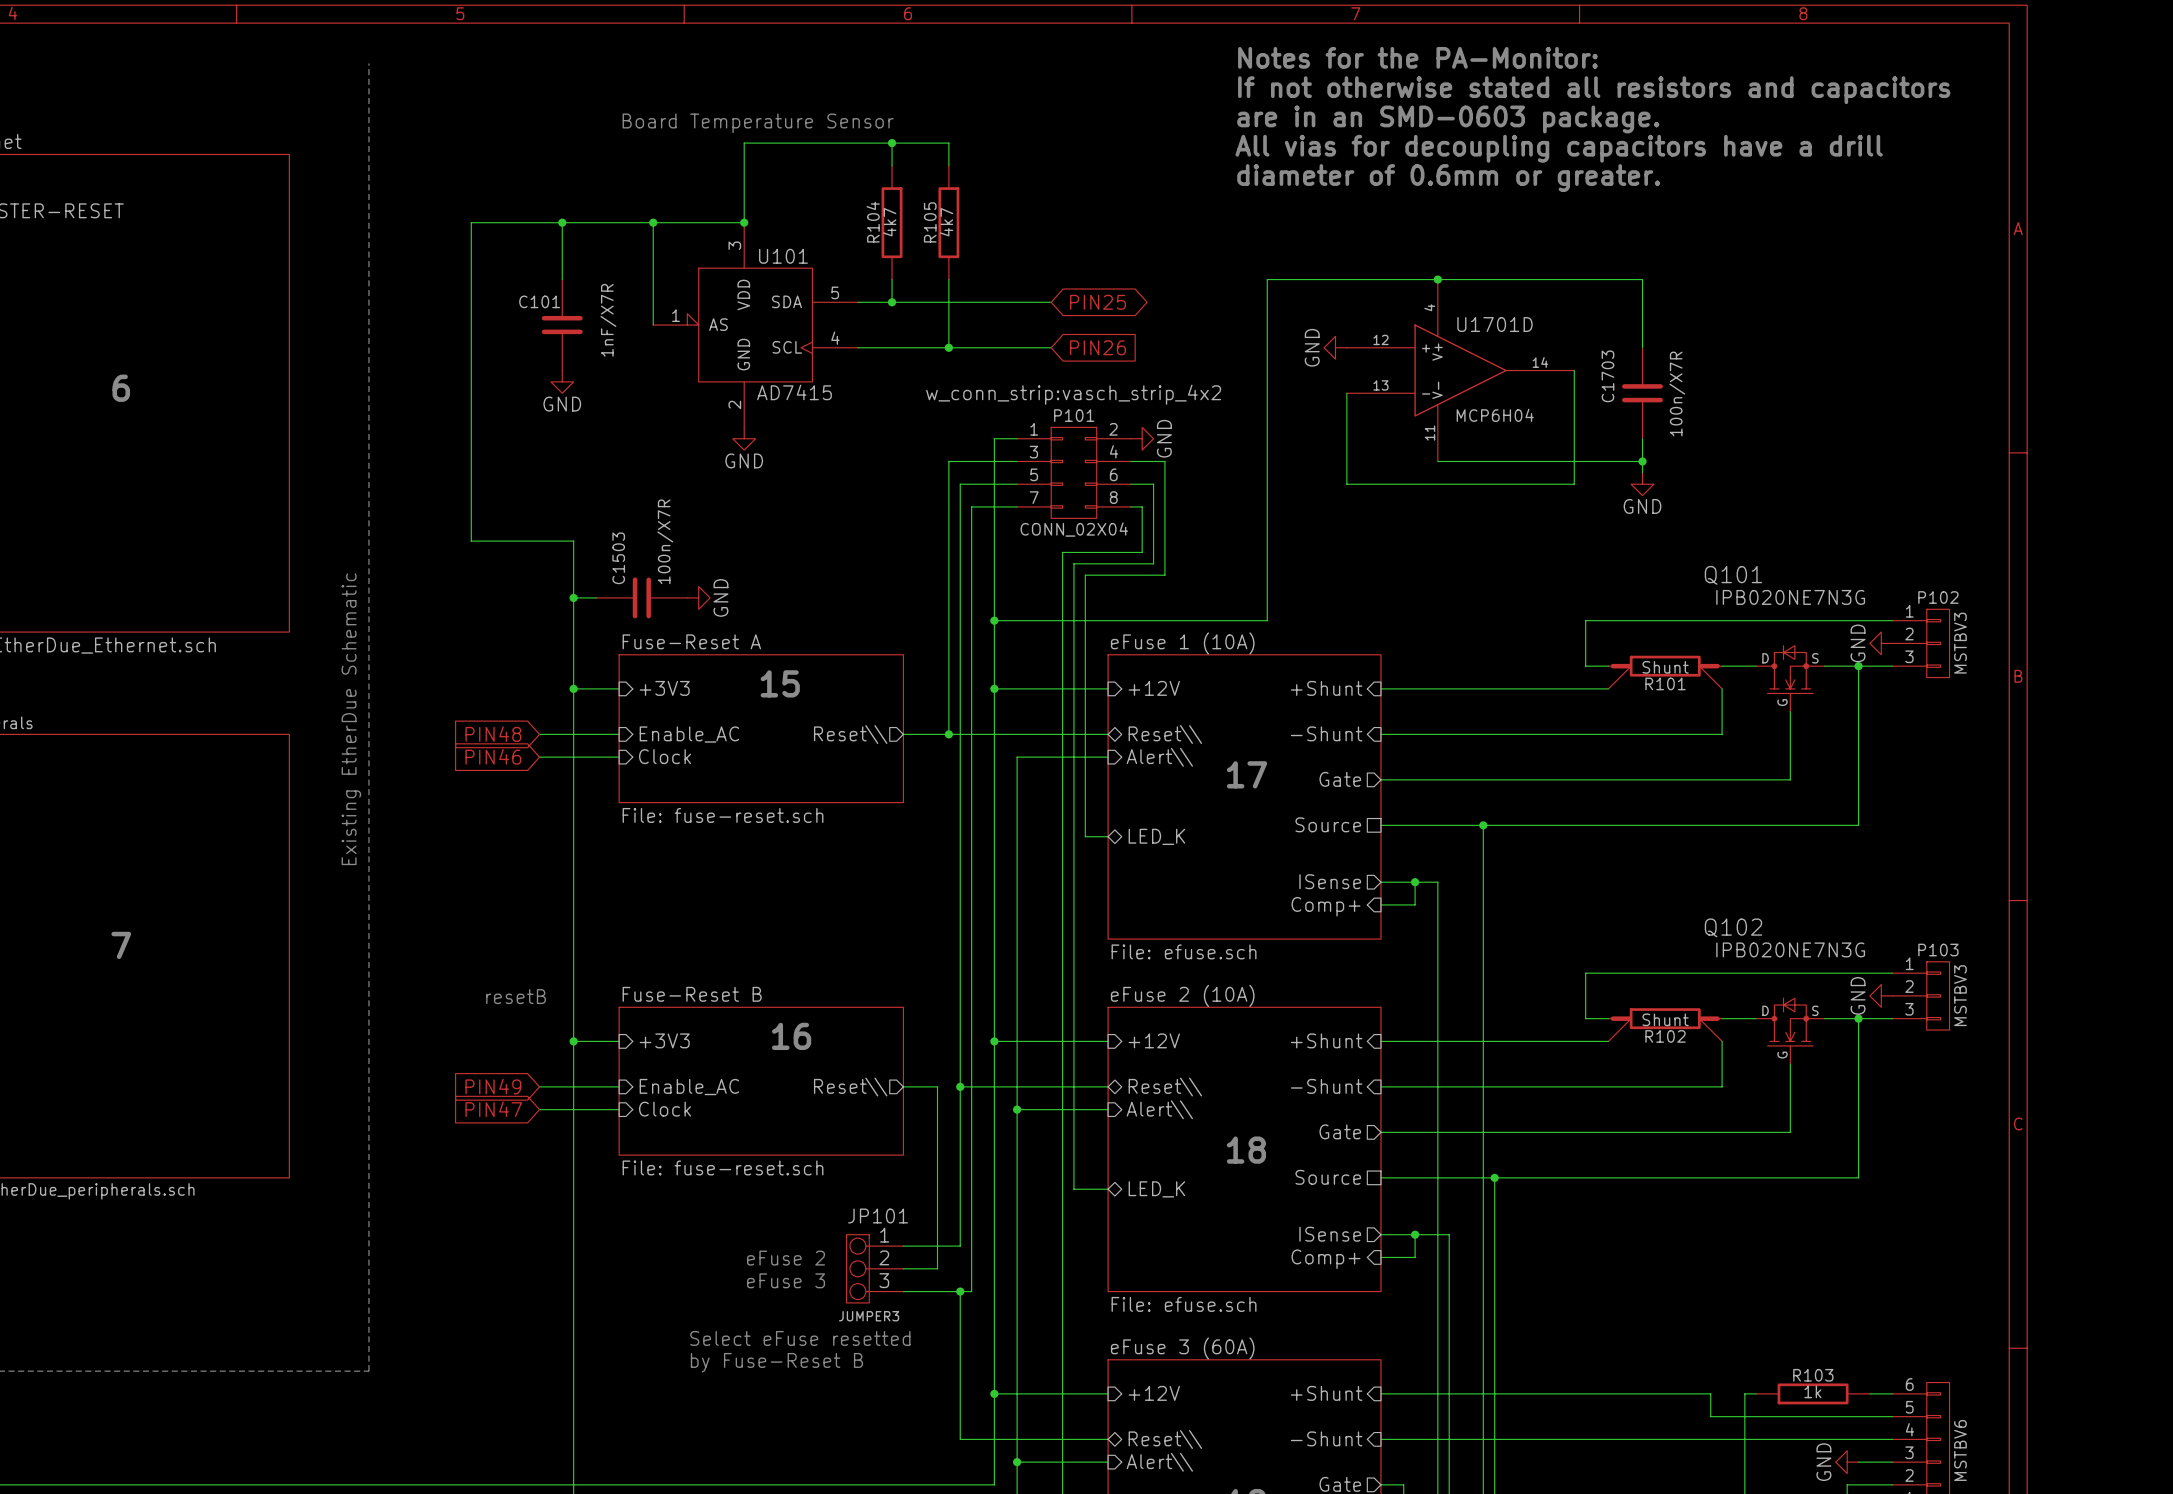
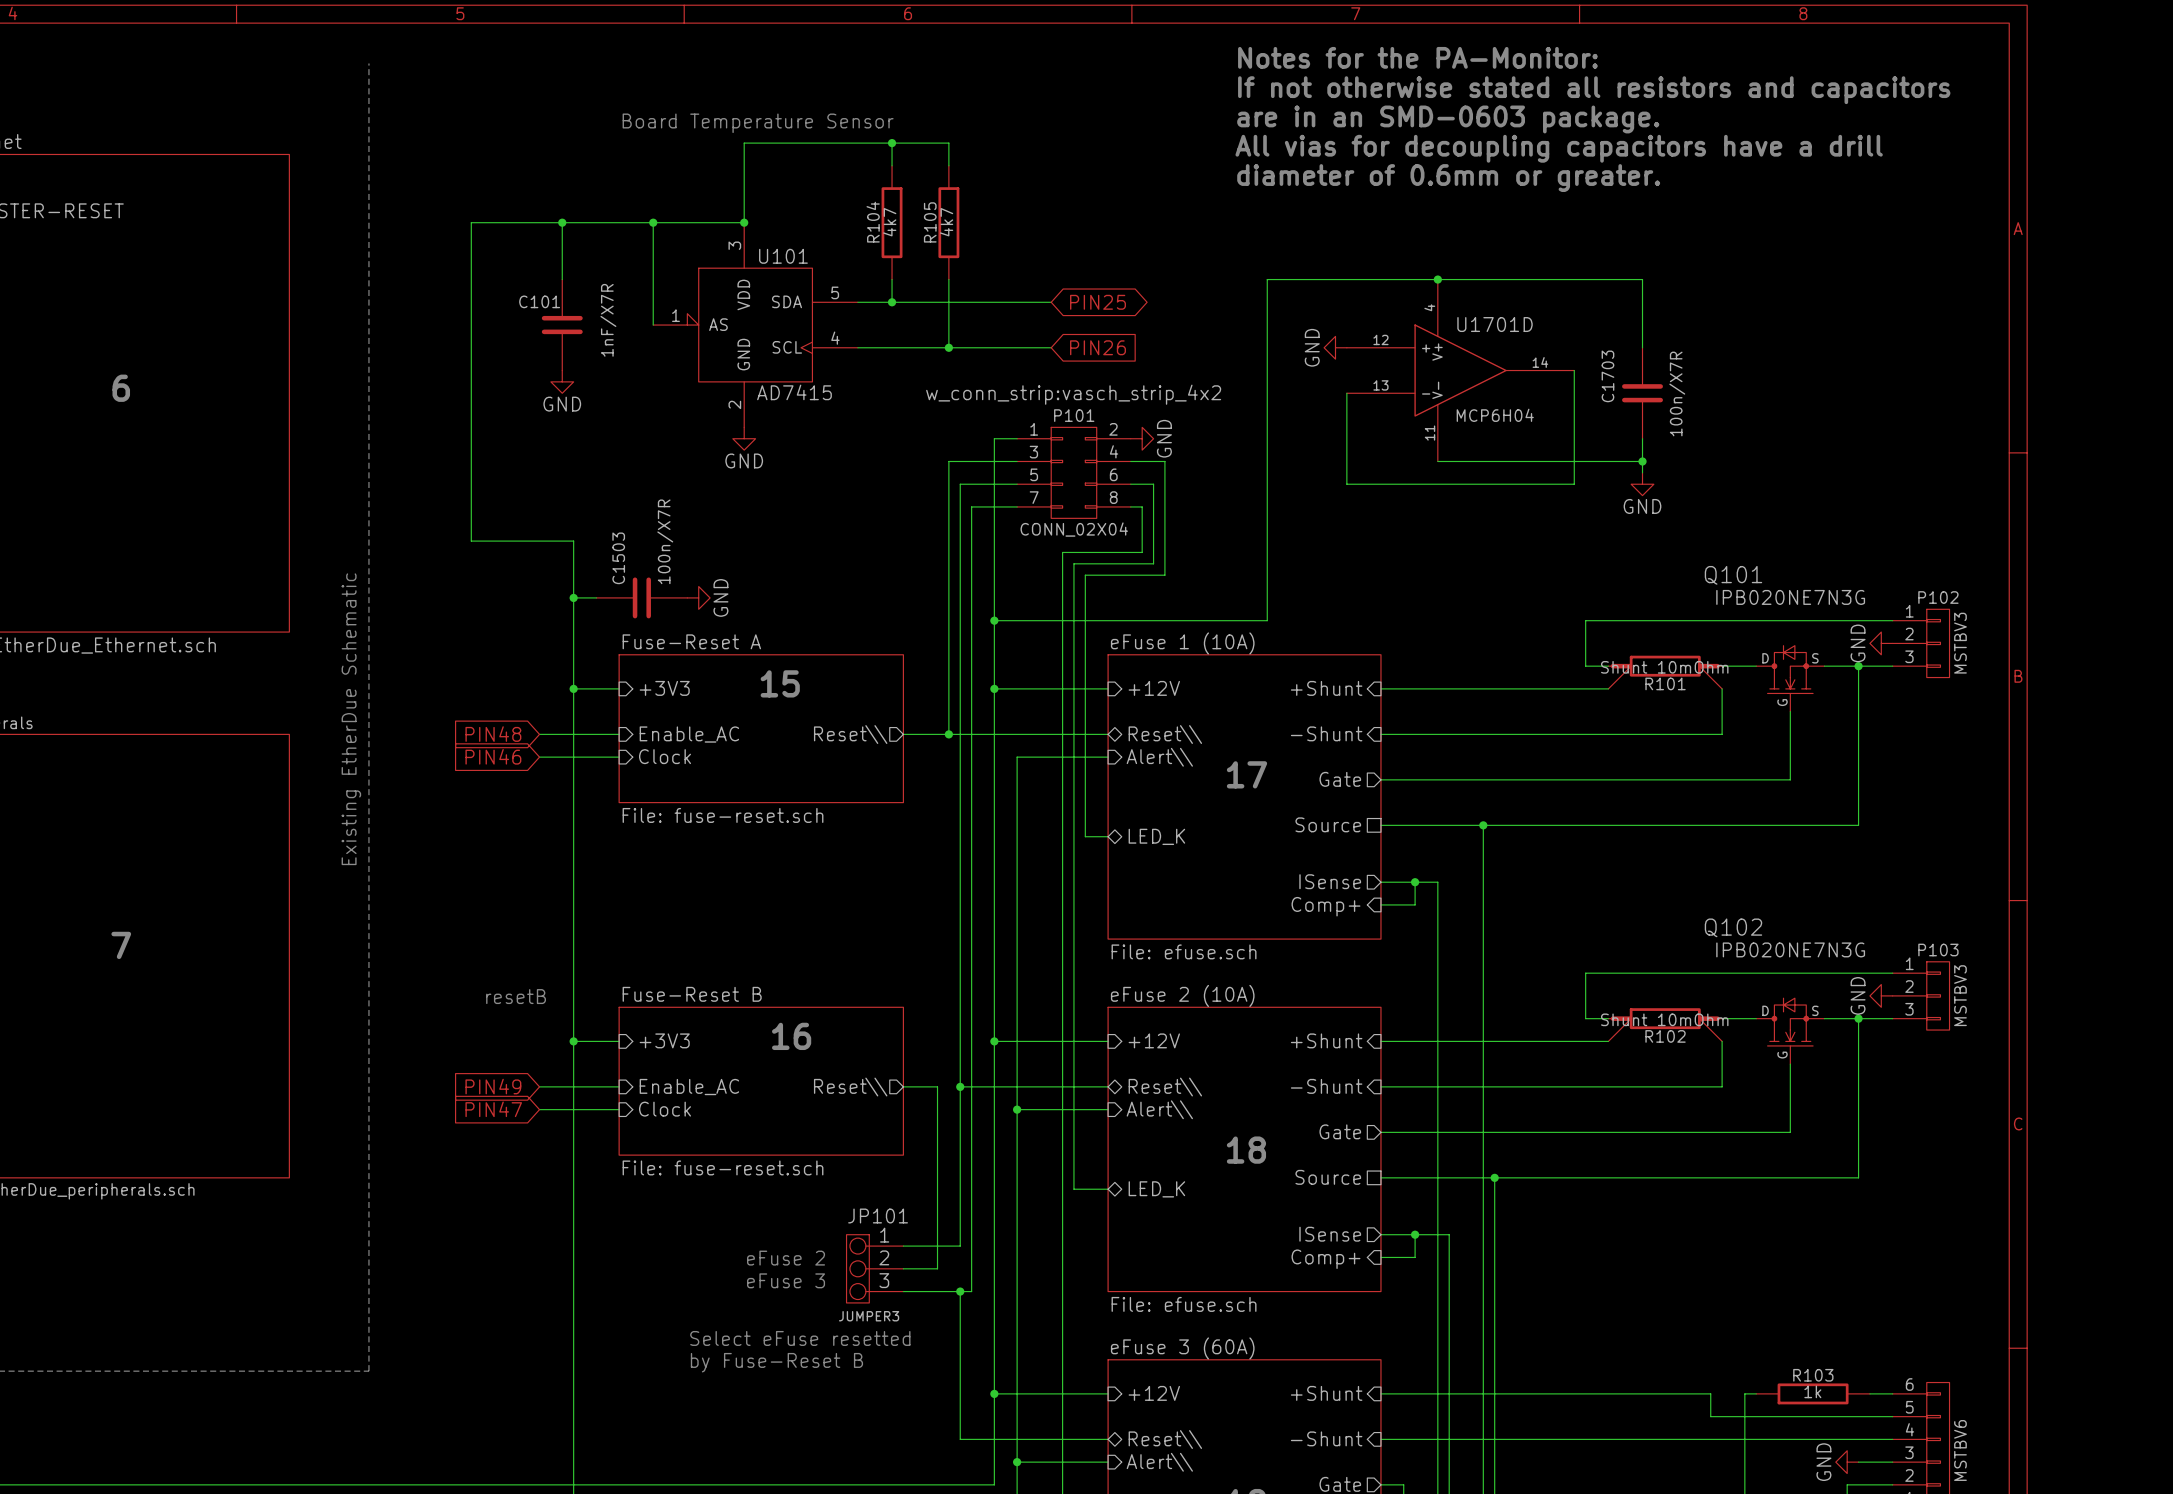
R101 value: Shunt (1665, 667) -> Shunt 10mOhm (1664, 667)
R102 value: Shunt (1665, 1019) -> Shunt 10mOhm (1664, 1019)

